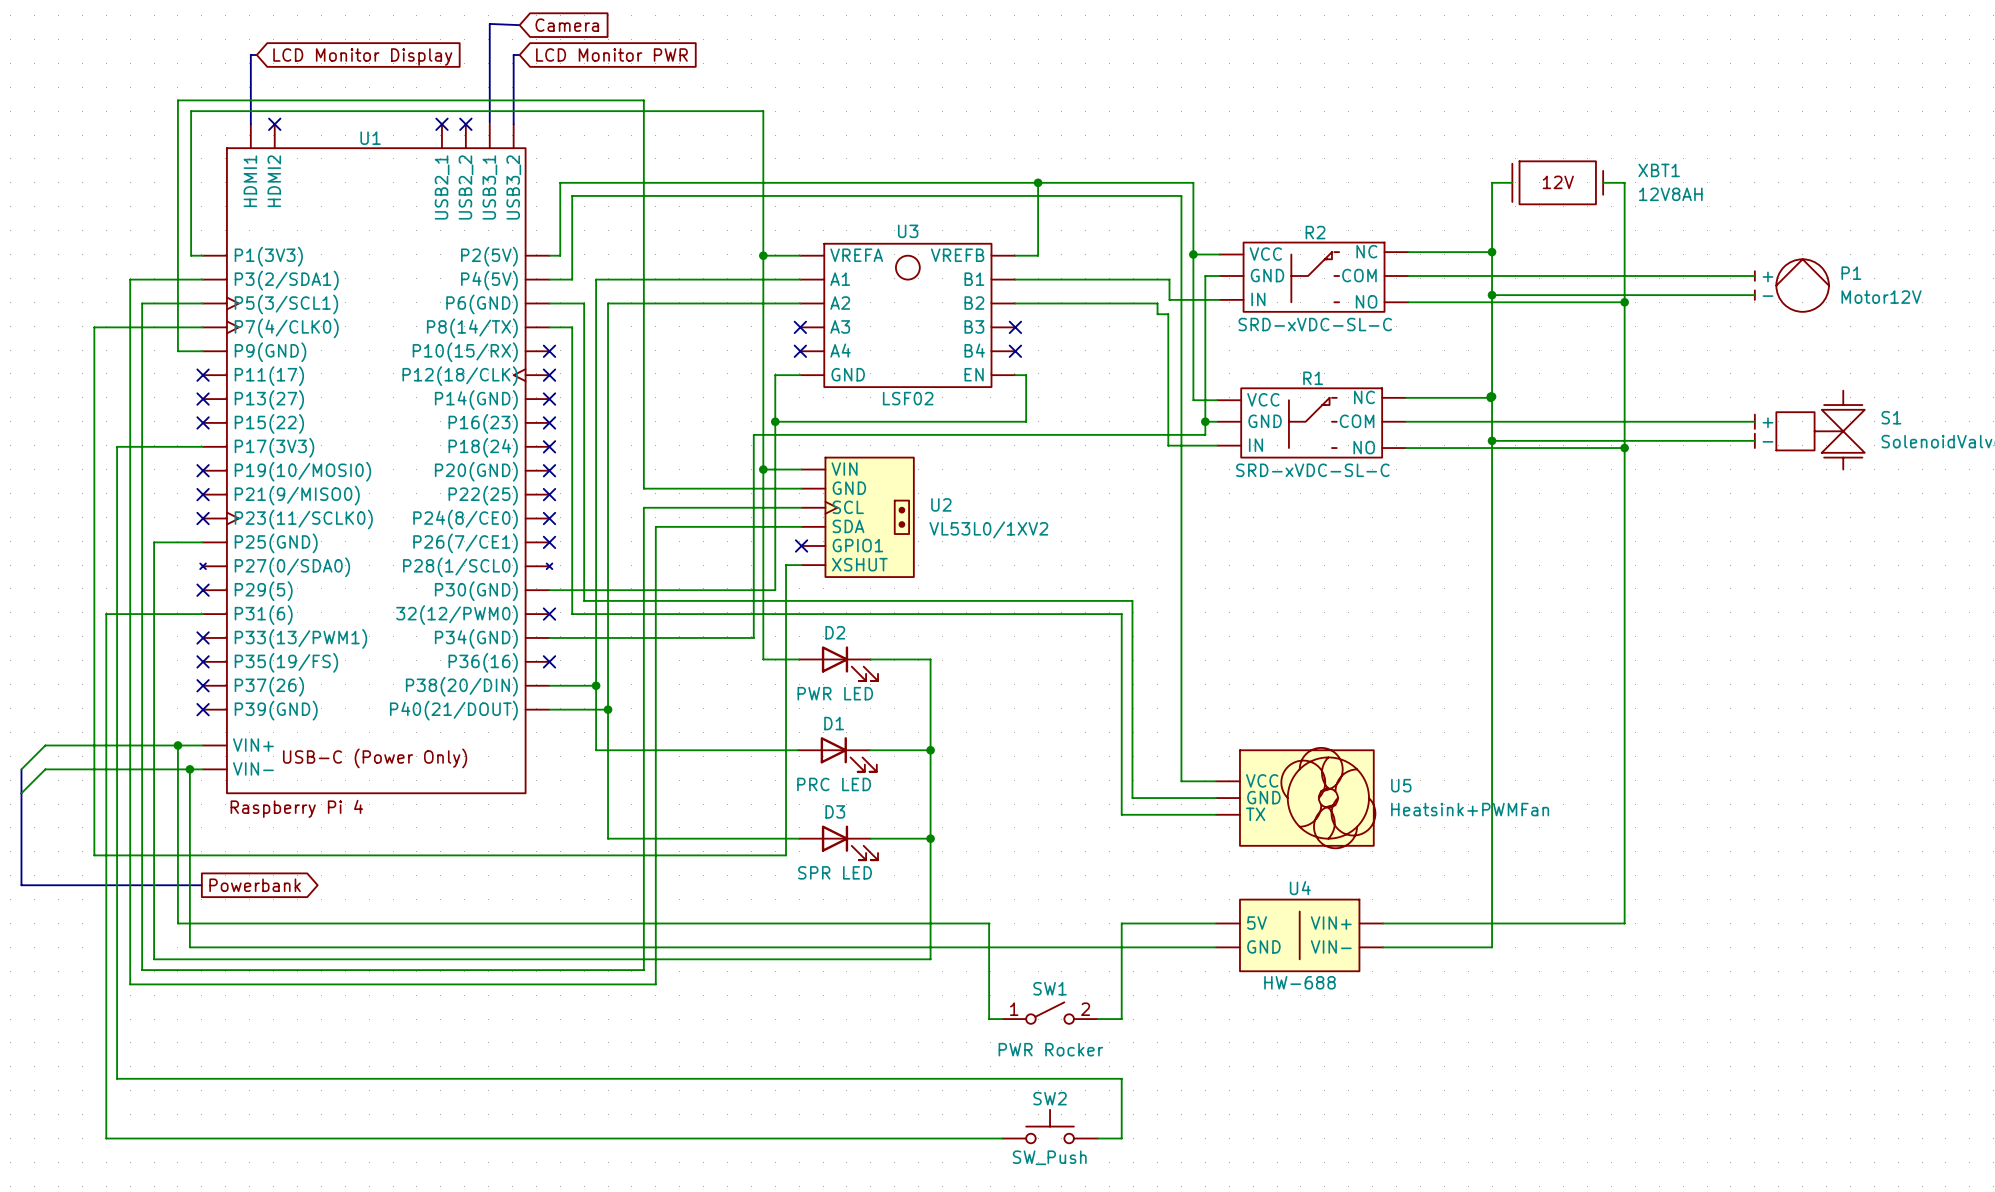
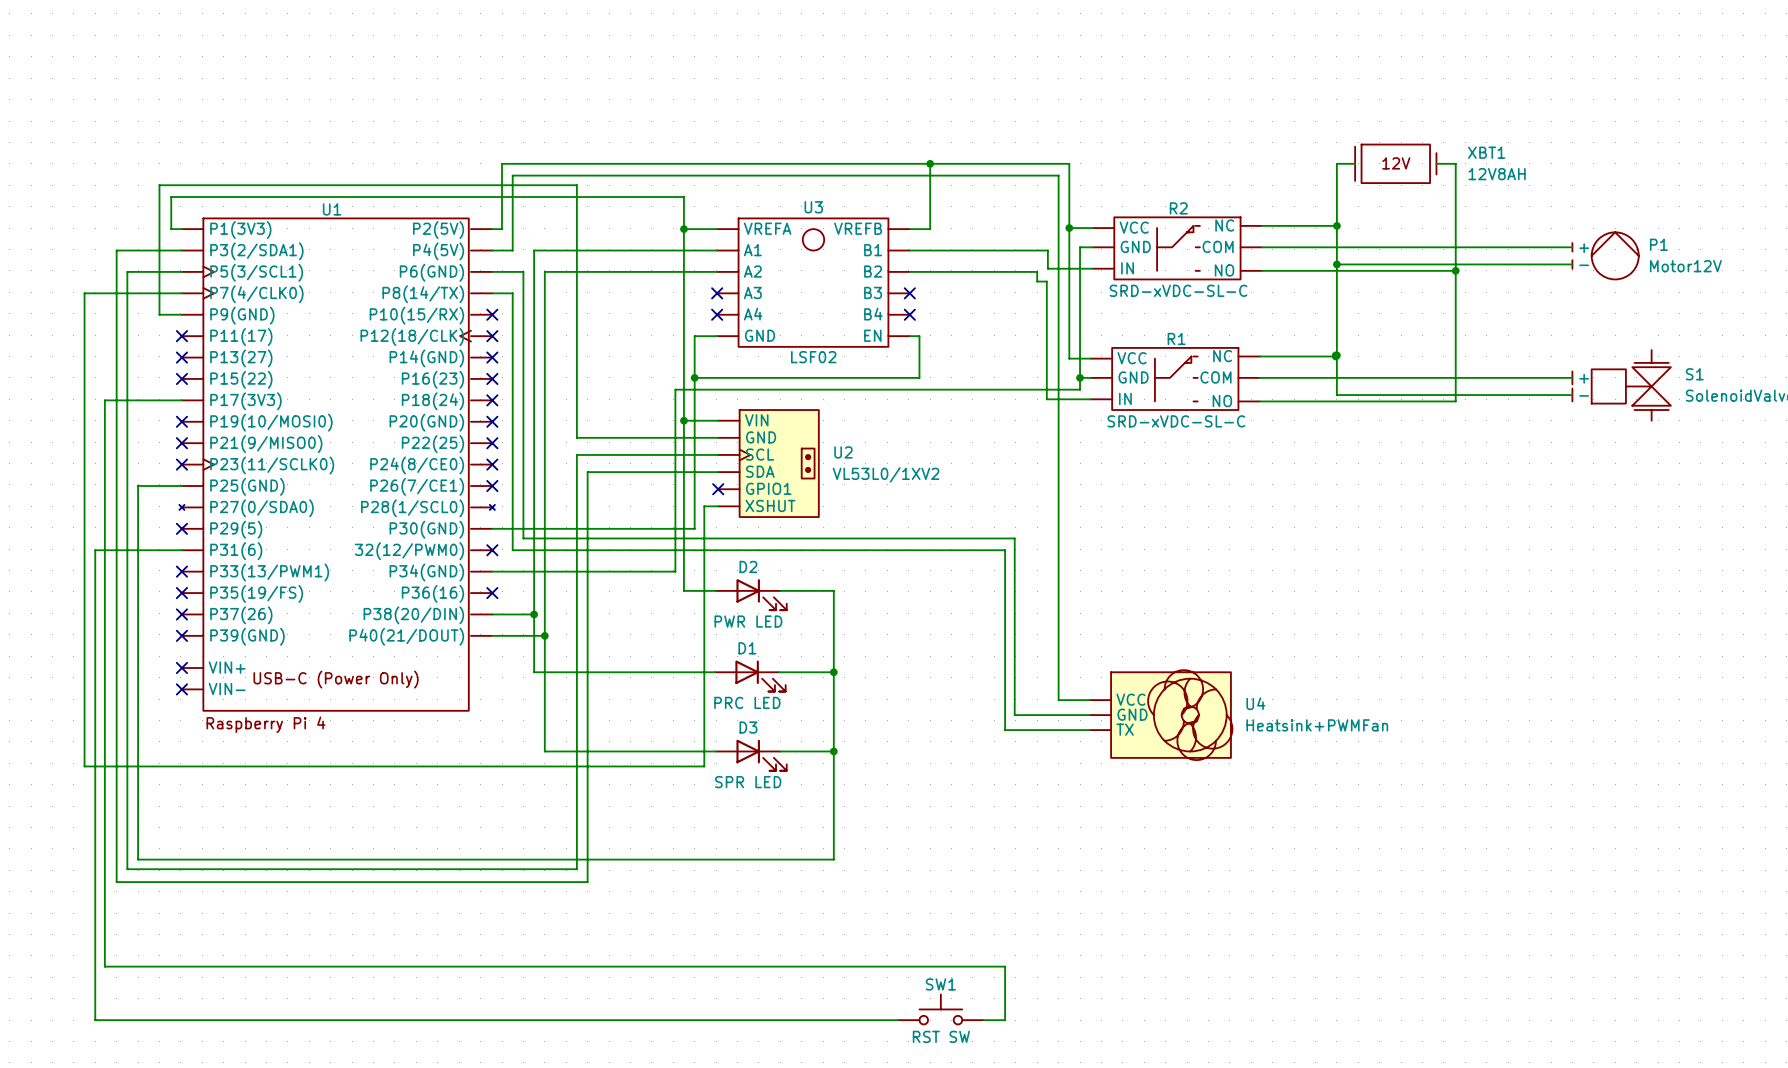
bus: (519, 25) (489, 23) (489, 123) -> none
global label: Camera (567, 25) -> none
bus: (256, 55) (250, 55) (250, 124) -> none
bus: (519, 55) (513, 55) (513, 124) -> none
global label: LCD Monitor PWR (611, 55) -> none
global label: LCD Monitor Display (362, 56) -> none
U1 symbol: [200, 124, 553, 794] -> [179, 218, 495, 711]
no-connect mark: (274, 124) -> none
no-connect mark: (441, 124) -> none
no-connect mark: (465, 124) -> none
U1 name position: U1 (370, 138) -> U1 (332, 209)
wire: (177, 206) (177, 100) (643, 100) (643, 206) -> (159, 185) (576, 185)
wire: (191, 219) (191, 111) (763, 111) (763, 219) -> (171, 197) (683, 197)
wire: (1492, 440) (1492, 947) (1383, 947) -> none
junction: (1492, 440) -> none
wire: (1624, 448) (1624, 923) (1383, 923) -> none
junction: (1624, 448) -> none
wire: (177, 745) (177, 923) (989, 923) (989, 1019) (1002, 1019) -> none
junction: (177, 745) -> none
wire: (203, 745) (45, 745) (21, 769) -> none
no-connect mark: none -> (181, 667)
bus: (21, 769) (21, 885) (201, 885) -> none
wire: (189, 769) (189, 947) (1216, 947) -> none
junction: (189, 769) -> none
wire: (203, 769) (45, 769) (21, 793) -> none
no-connect mark: none -> (181, 689)
U5 name: U5 (1401, 785) -> U4 (1255, 703)
global label: Powerbank (255, 885) -> none
wire: (1216, 923) (1121, 923) (1121, 1019) (1097, 1019) -> none
U4: HW-688 (1299, 935) -> none
SW1: PWR Rocker (1050, 1013) -> none
SW2 name: SW2 (1050, 1098) -> SW1 (940, 984)
SW2 value: SW_Push (1049, 1157) -> RST SW (941, 1036)

